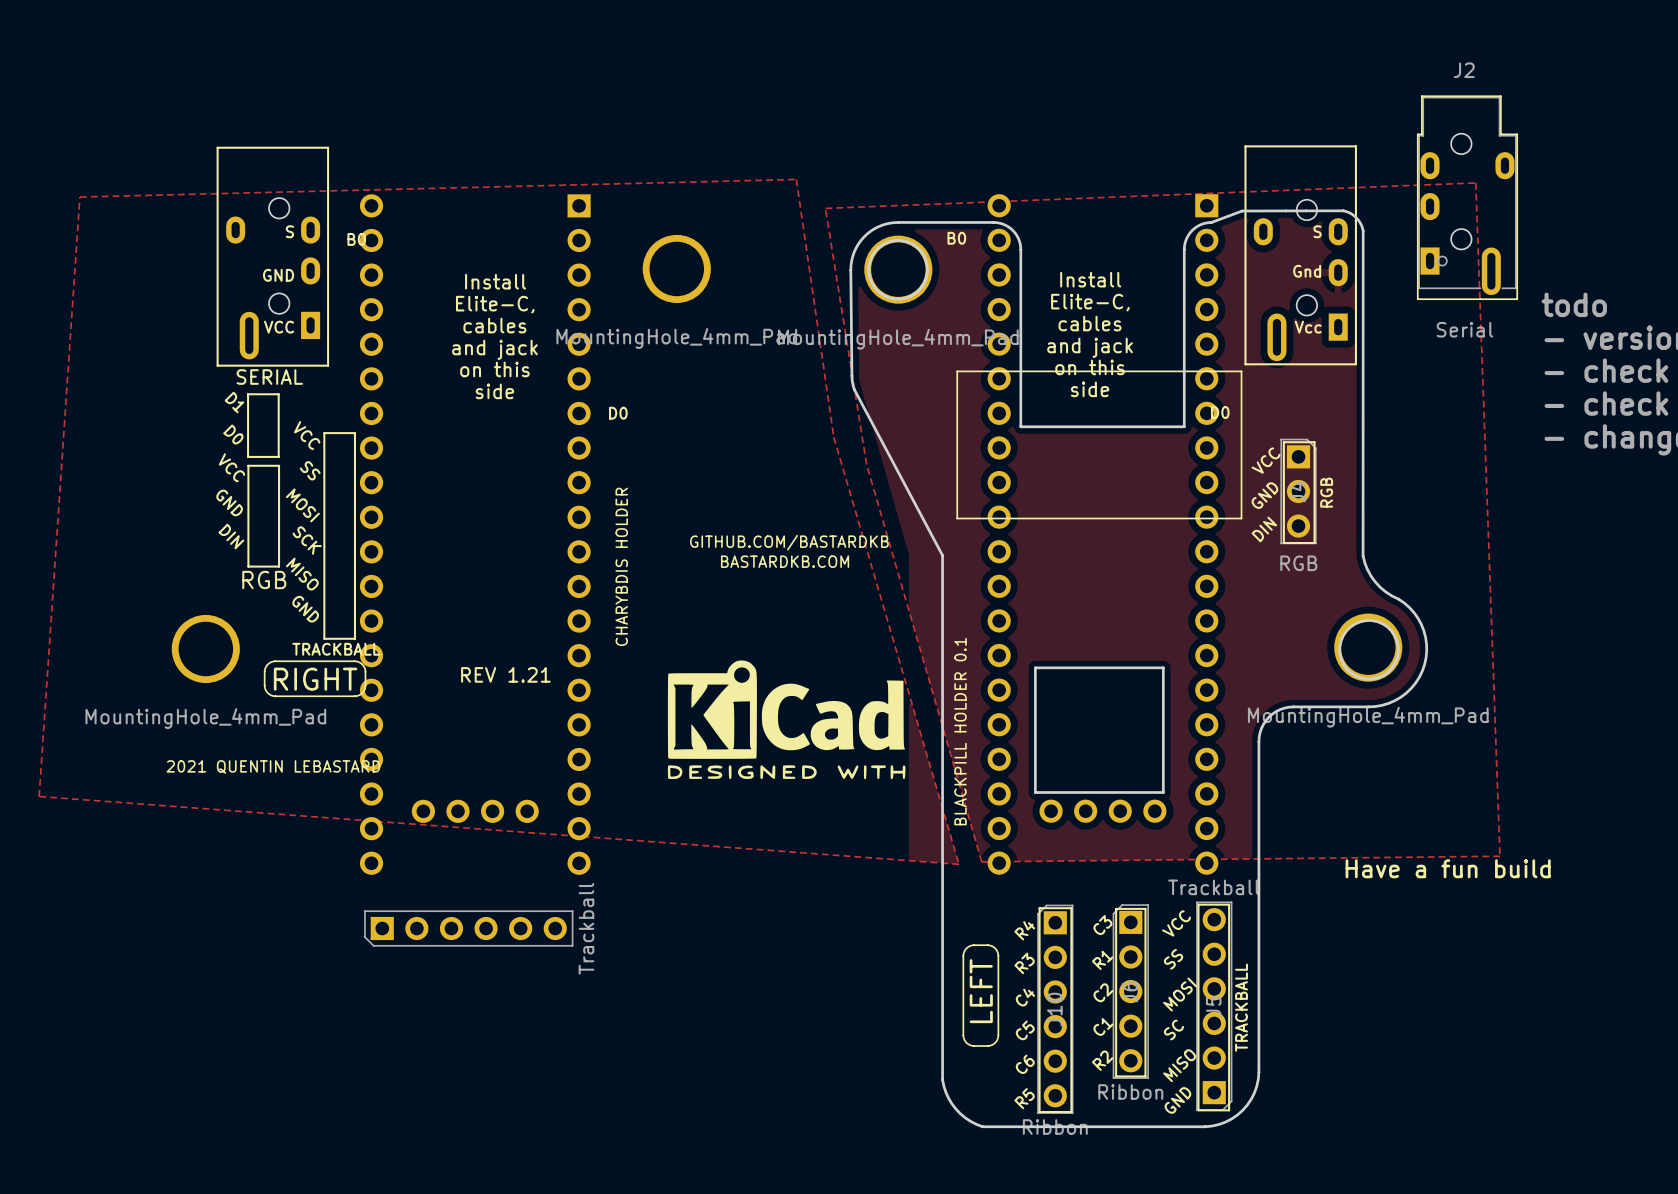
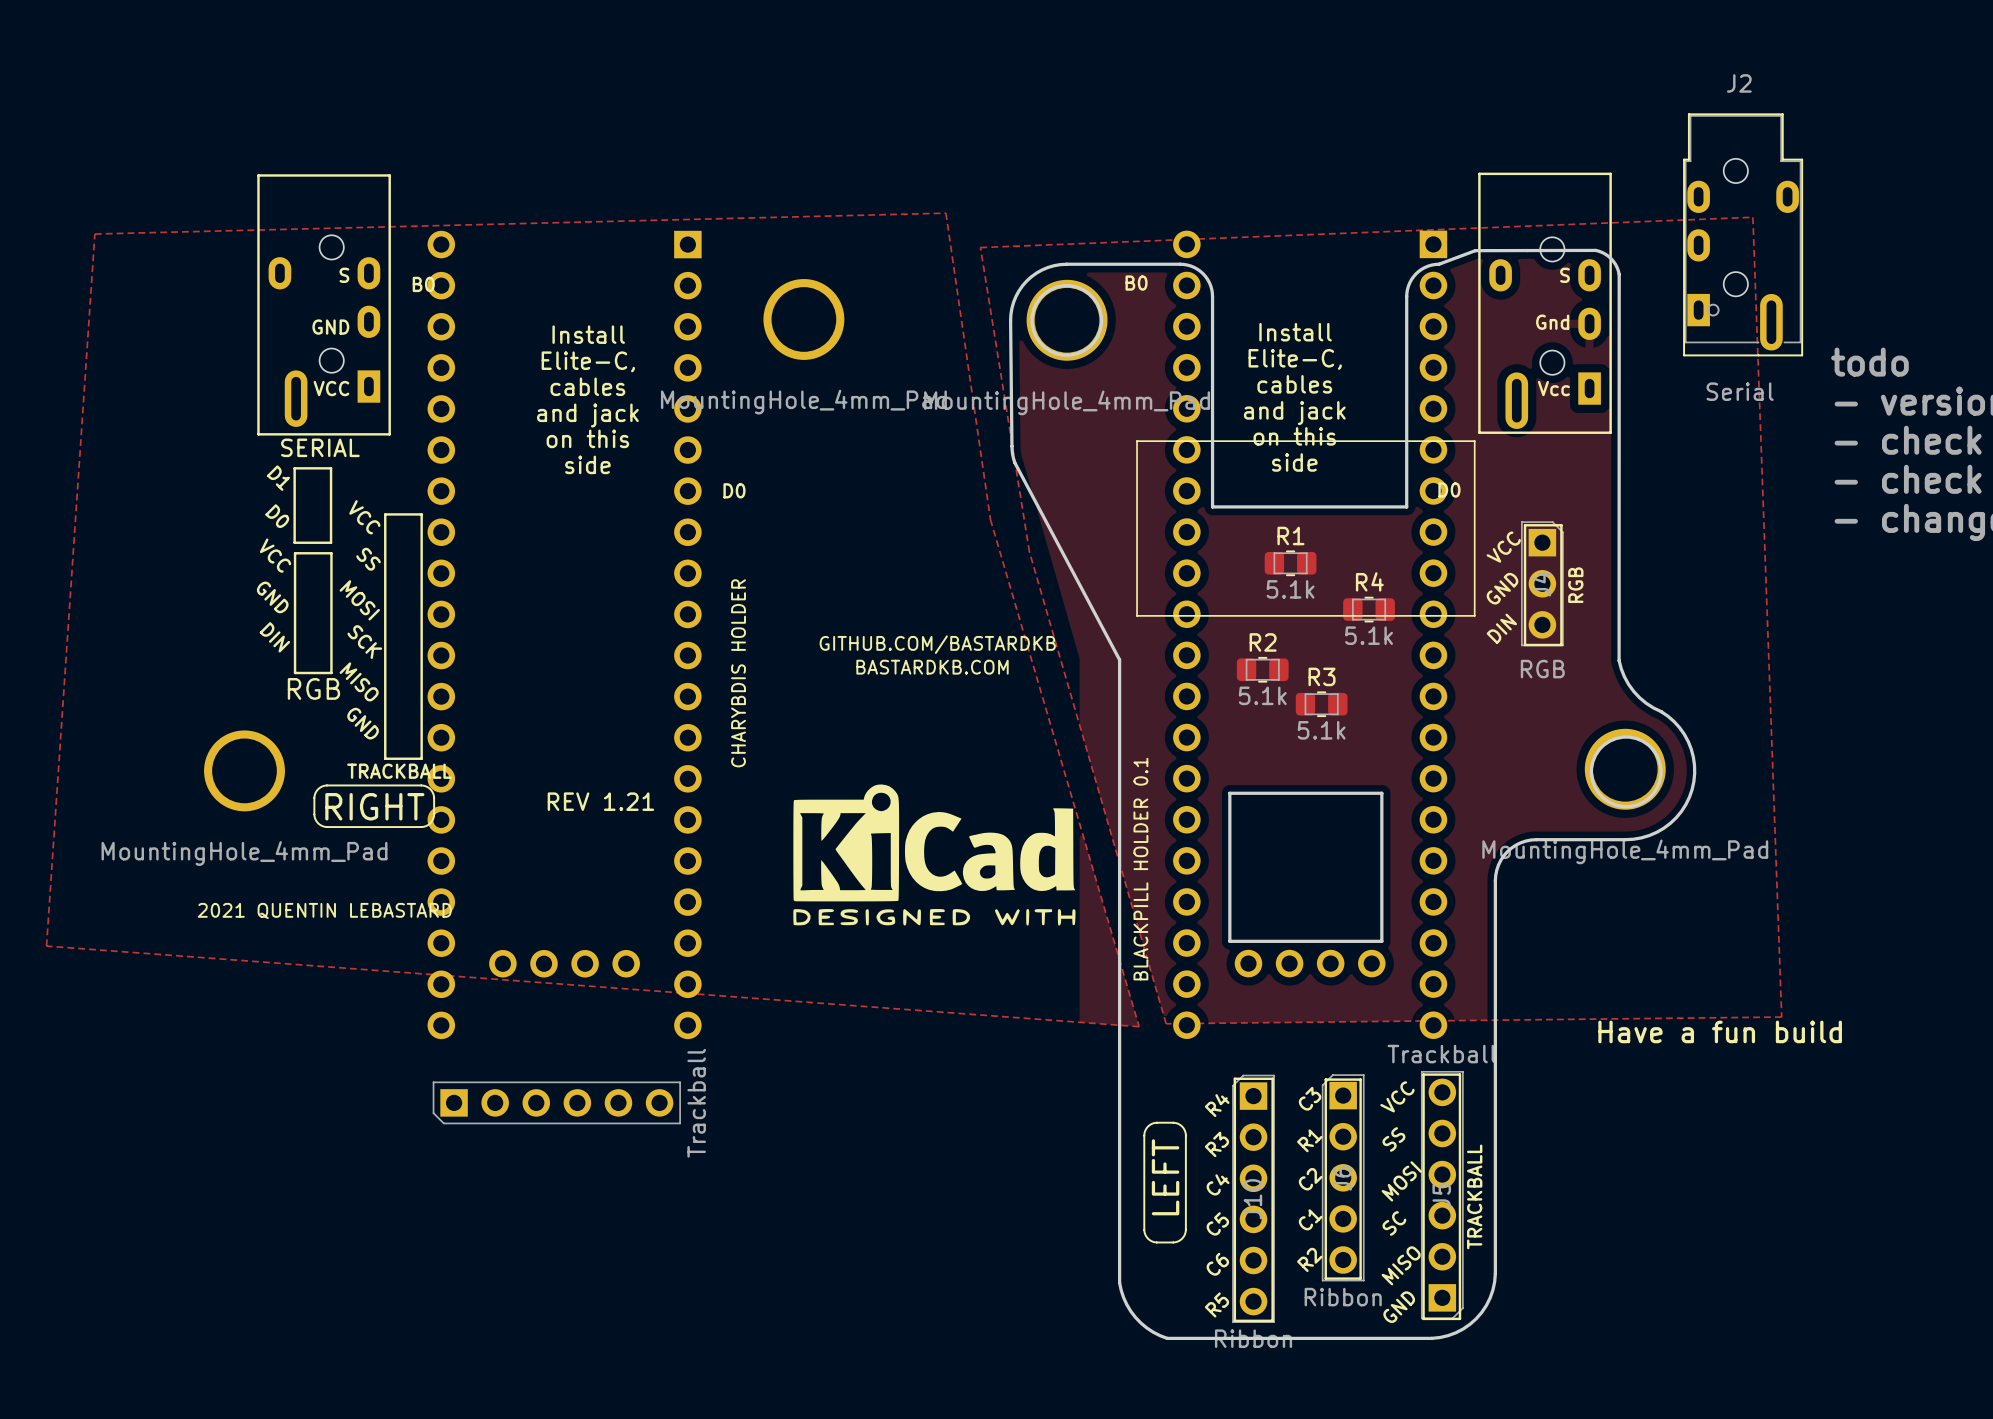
R1: none -> 5.1k (1290, 563)
R4: none -> 5.1k (1369, 609)
R2: none -> 5.1k (1262, 669)
R3: none -> 5.1k (1321, 704)

